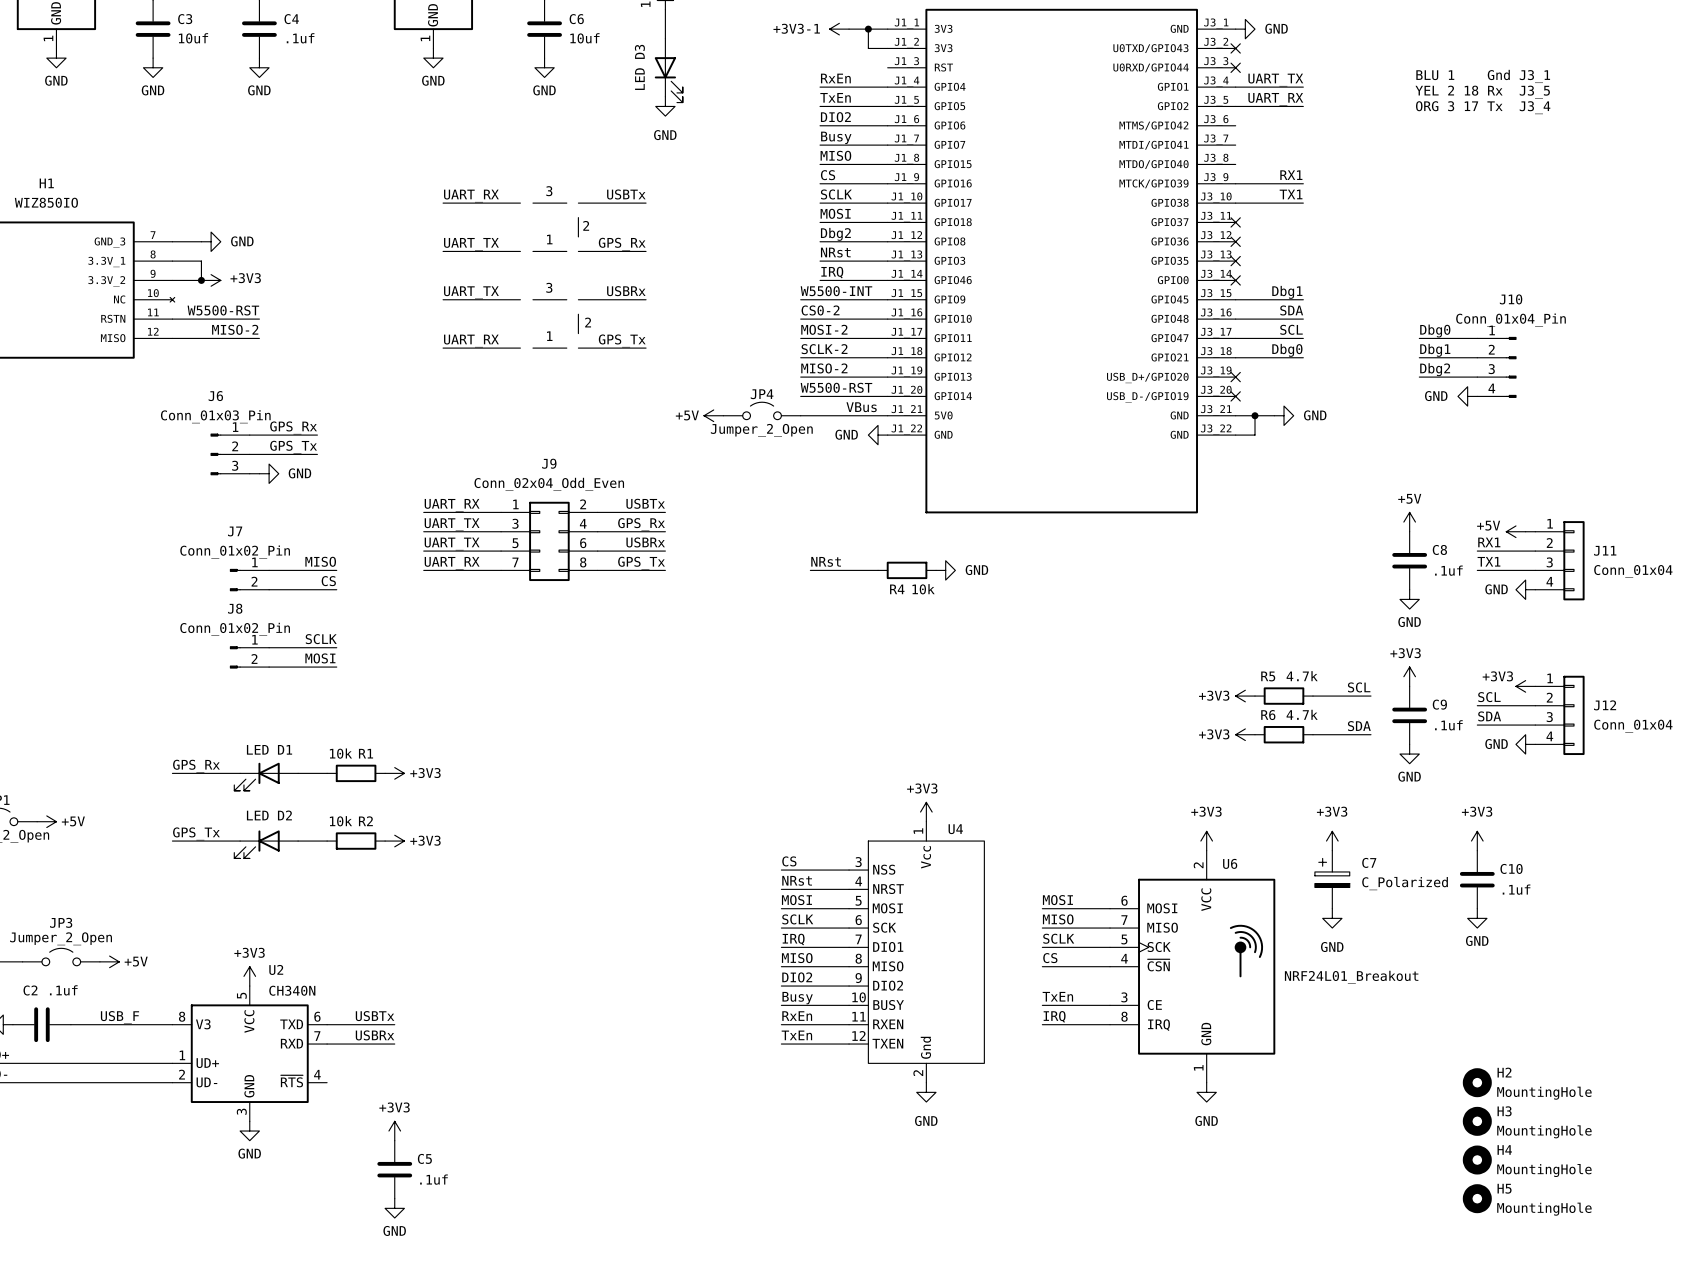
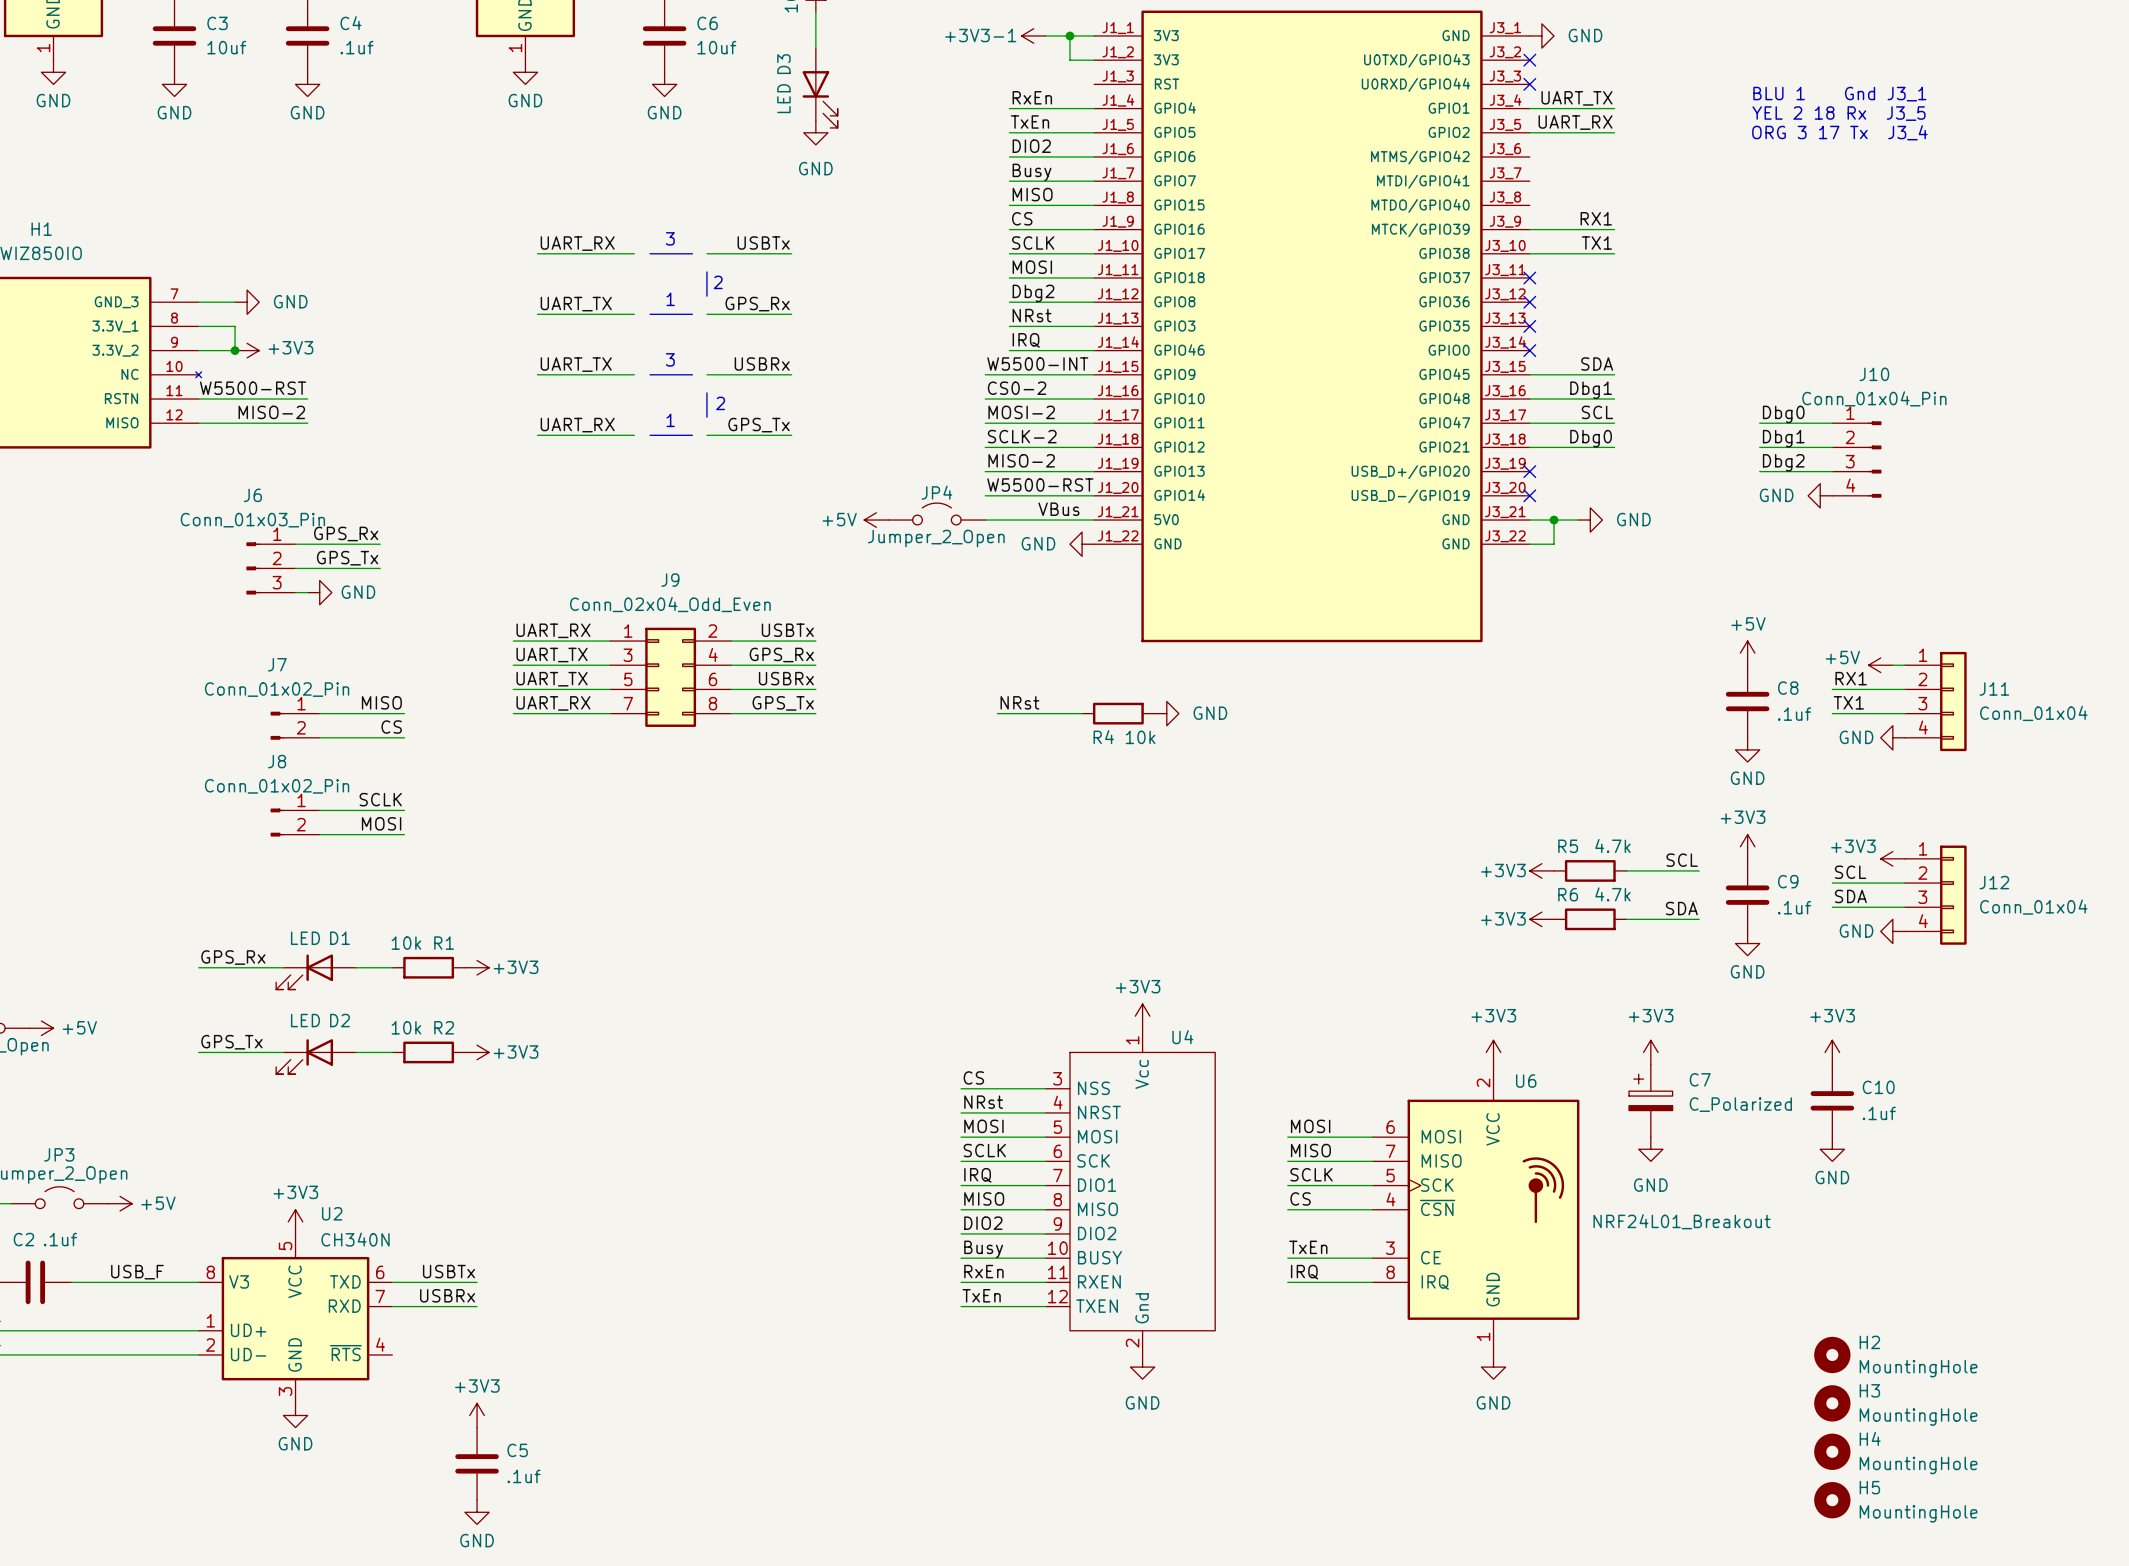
label: Dbg1 (1287, 292) -> SDA (1597, 364)
label: SDA (1291, 310) -> Dbg1 (1591, 390)

